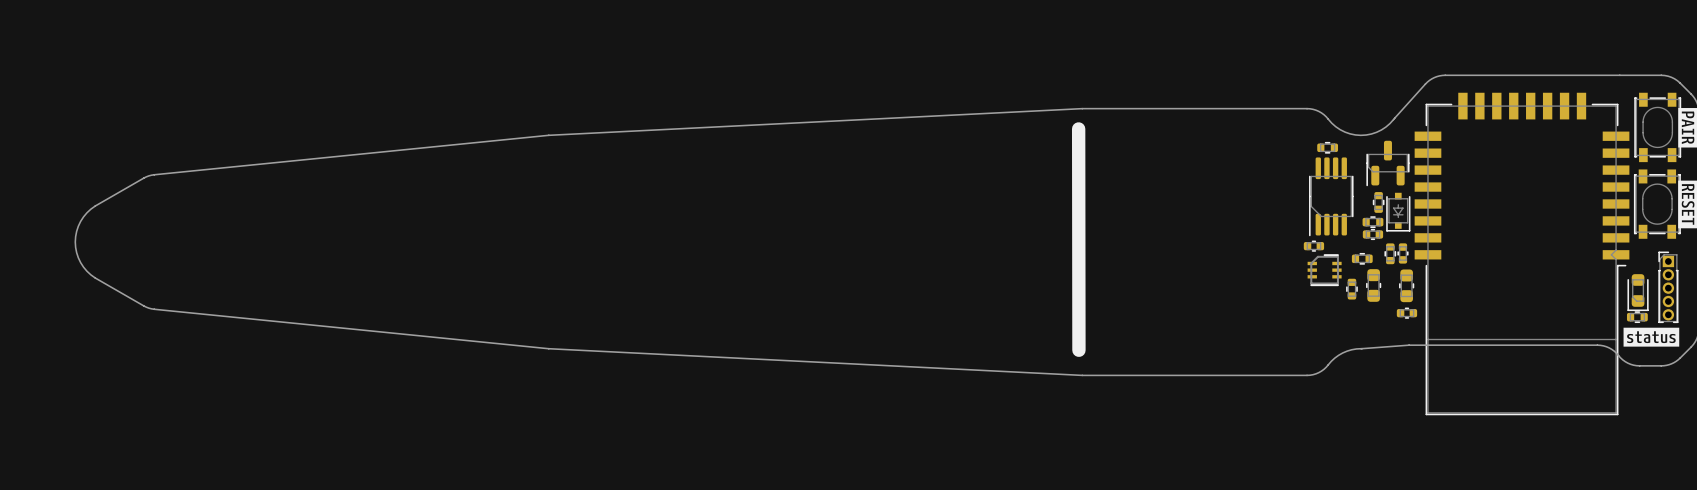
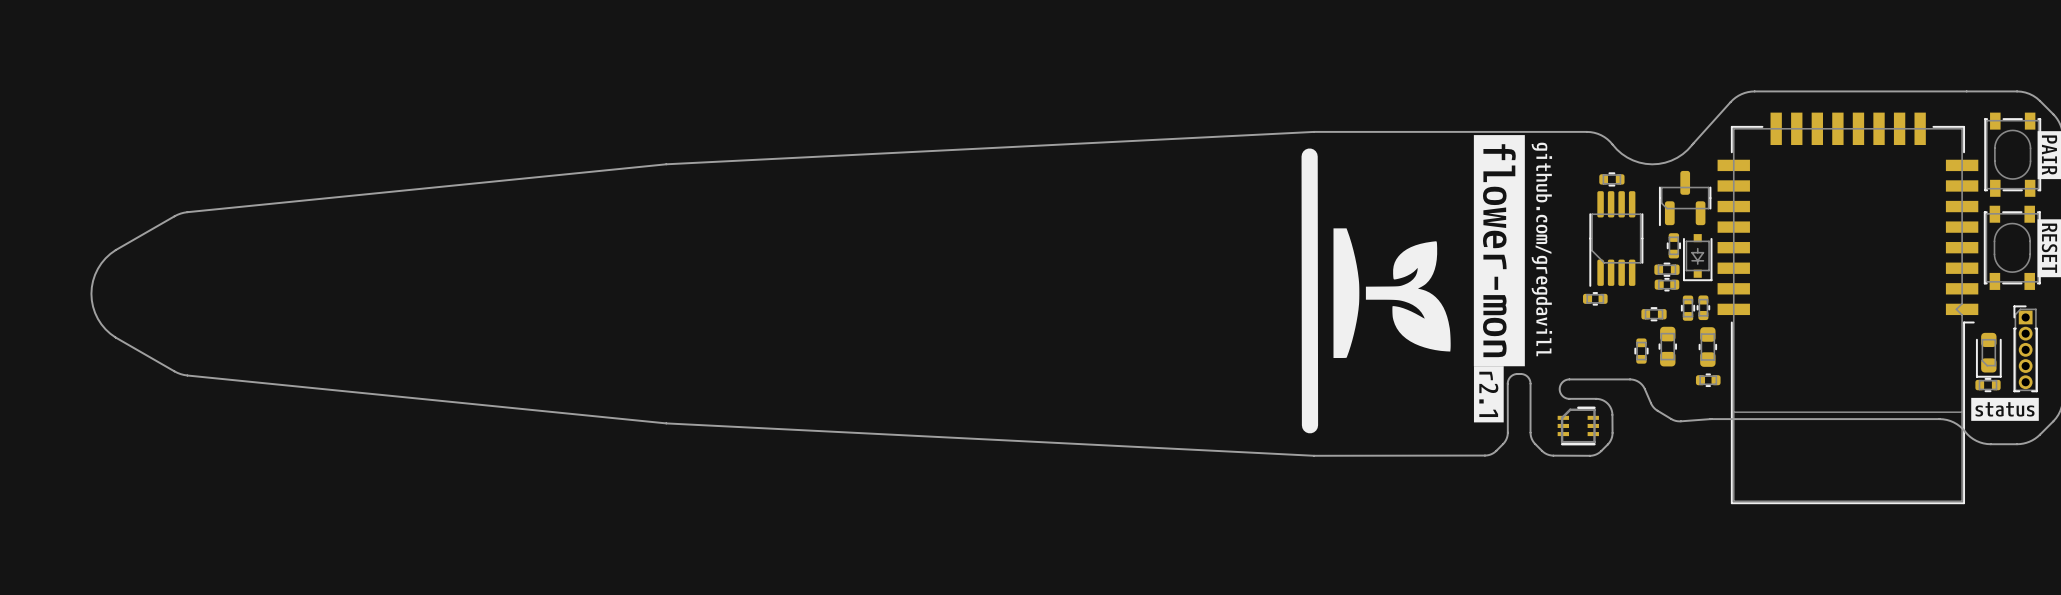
drawing: none -> [1473, 135, 1553, 423]
drawing: none -> [1333, 228, 1451, 358]
part position: (1324, 270) -> (1578, 425)
board edge: (1384, 347) (1347, 351) (1334, 358) (1321, 371) (1310, 375) (1082, 375) -> (1680, 421) (1672, 419) (1654, 408) (1643, 385) (1635, 380) (1567, 379) (1562, 382) (1559, 387) (1563, 397) (1598, 398) (1609, 405) (1612, 412) (1612, 436) (1607, 444) (1594, 455) (1549, 455) (1535, 444) (1531, 436) (1529, 380) (1525, 374) (1516, 374) (1510, 376) (1507, 382) (1507, 437) (1503, 444) (1491, 454) (1314, 455)

